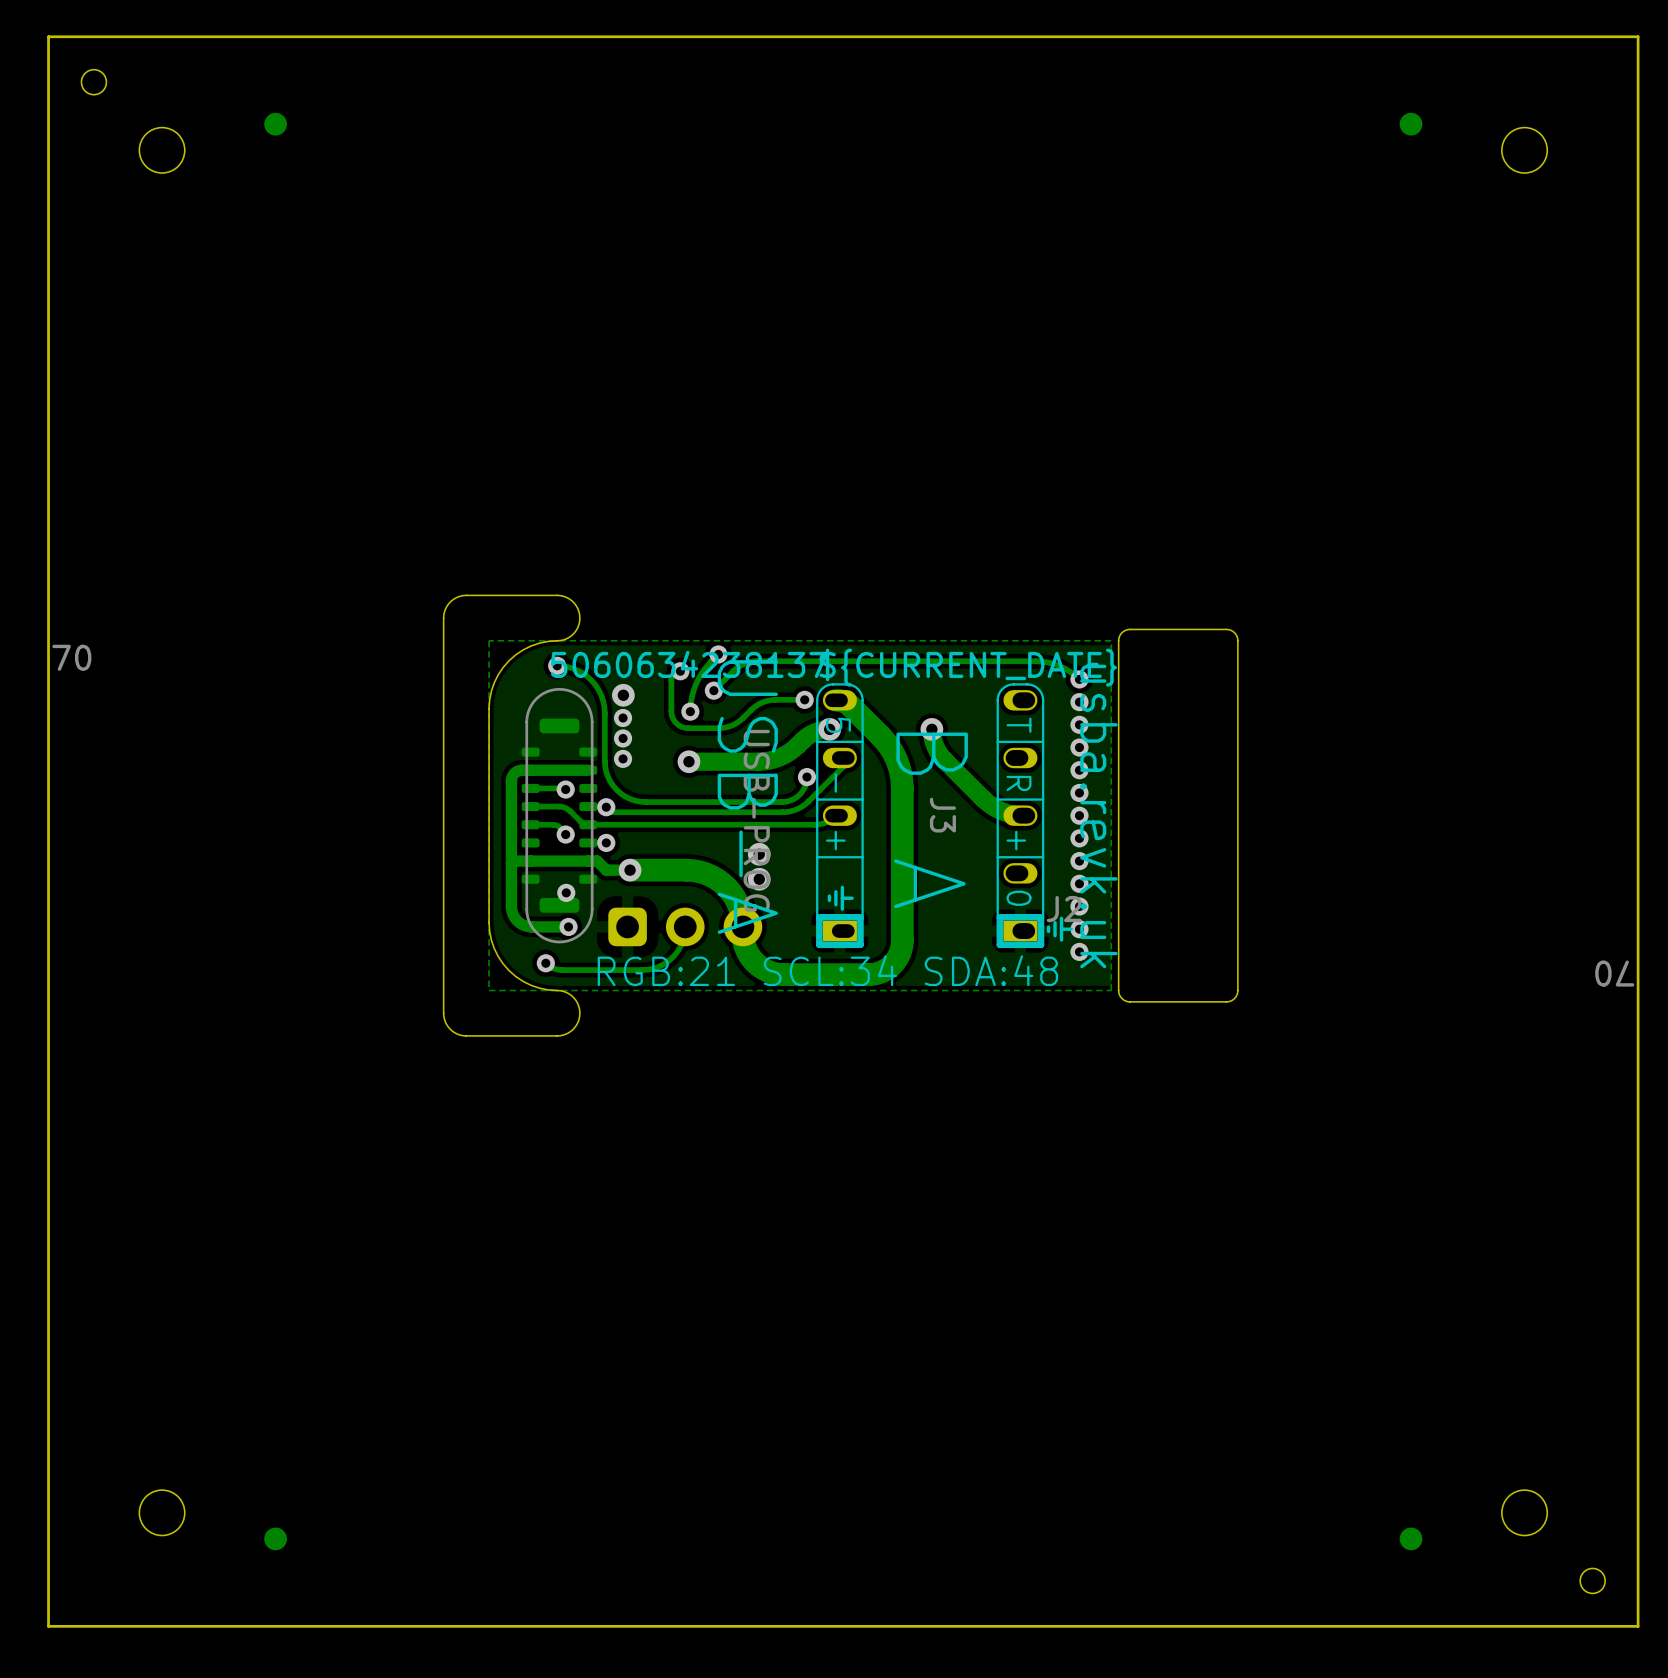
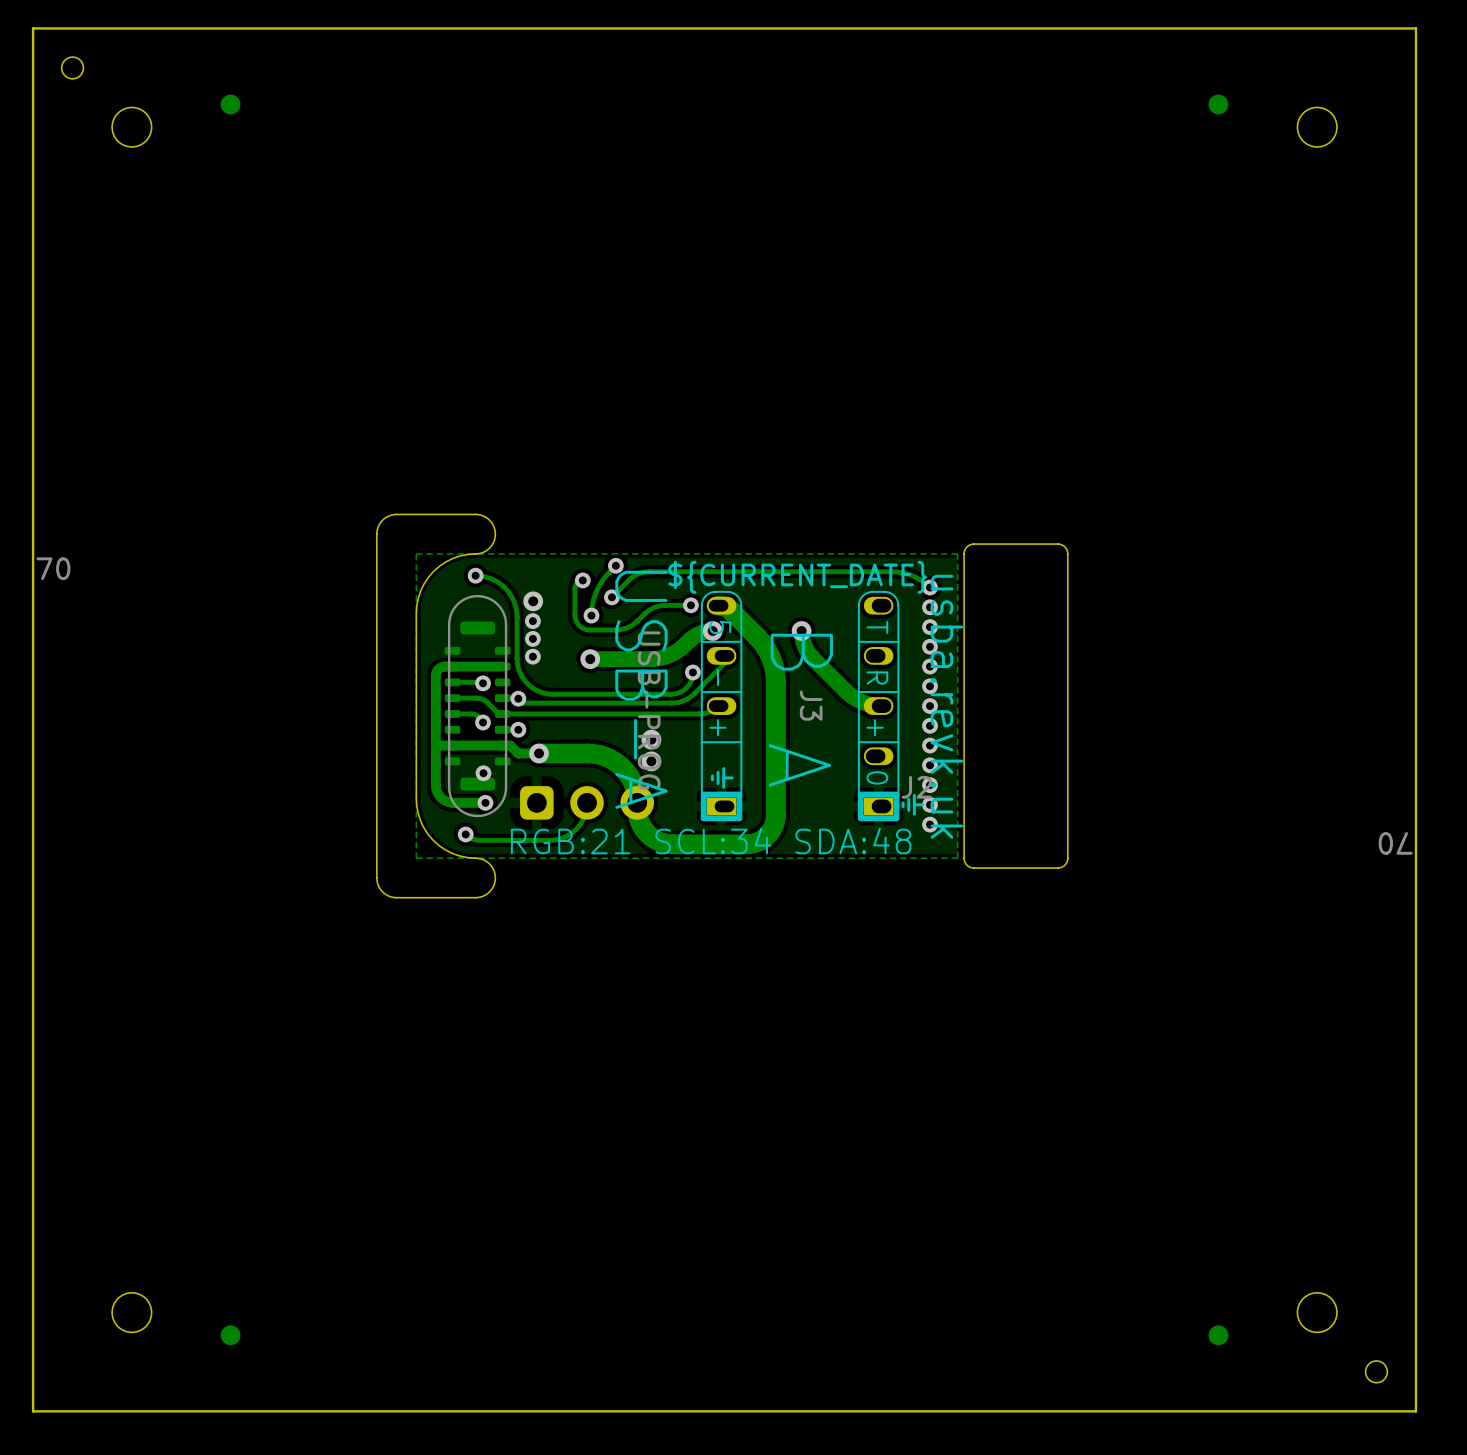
text: 5060634238137 (689, 664) -> none
text position: ${CURRENT_DATE} (968, 667) -> ${CURRENT_DATE} (797, 577)

